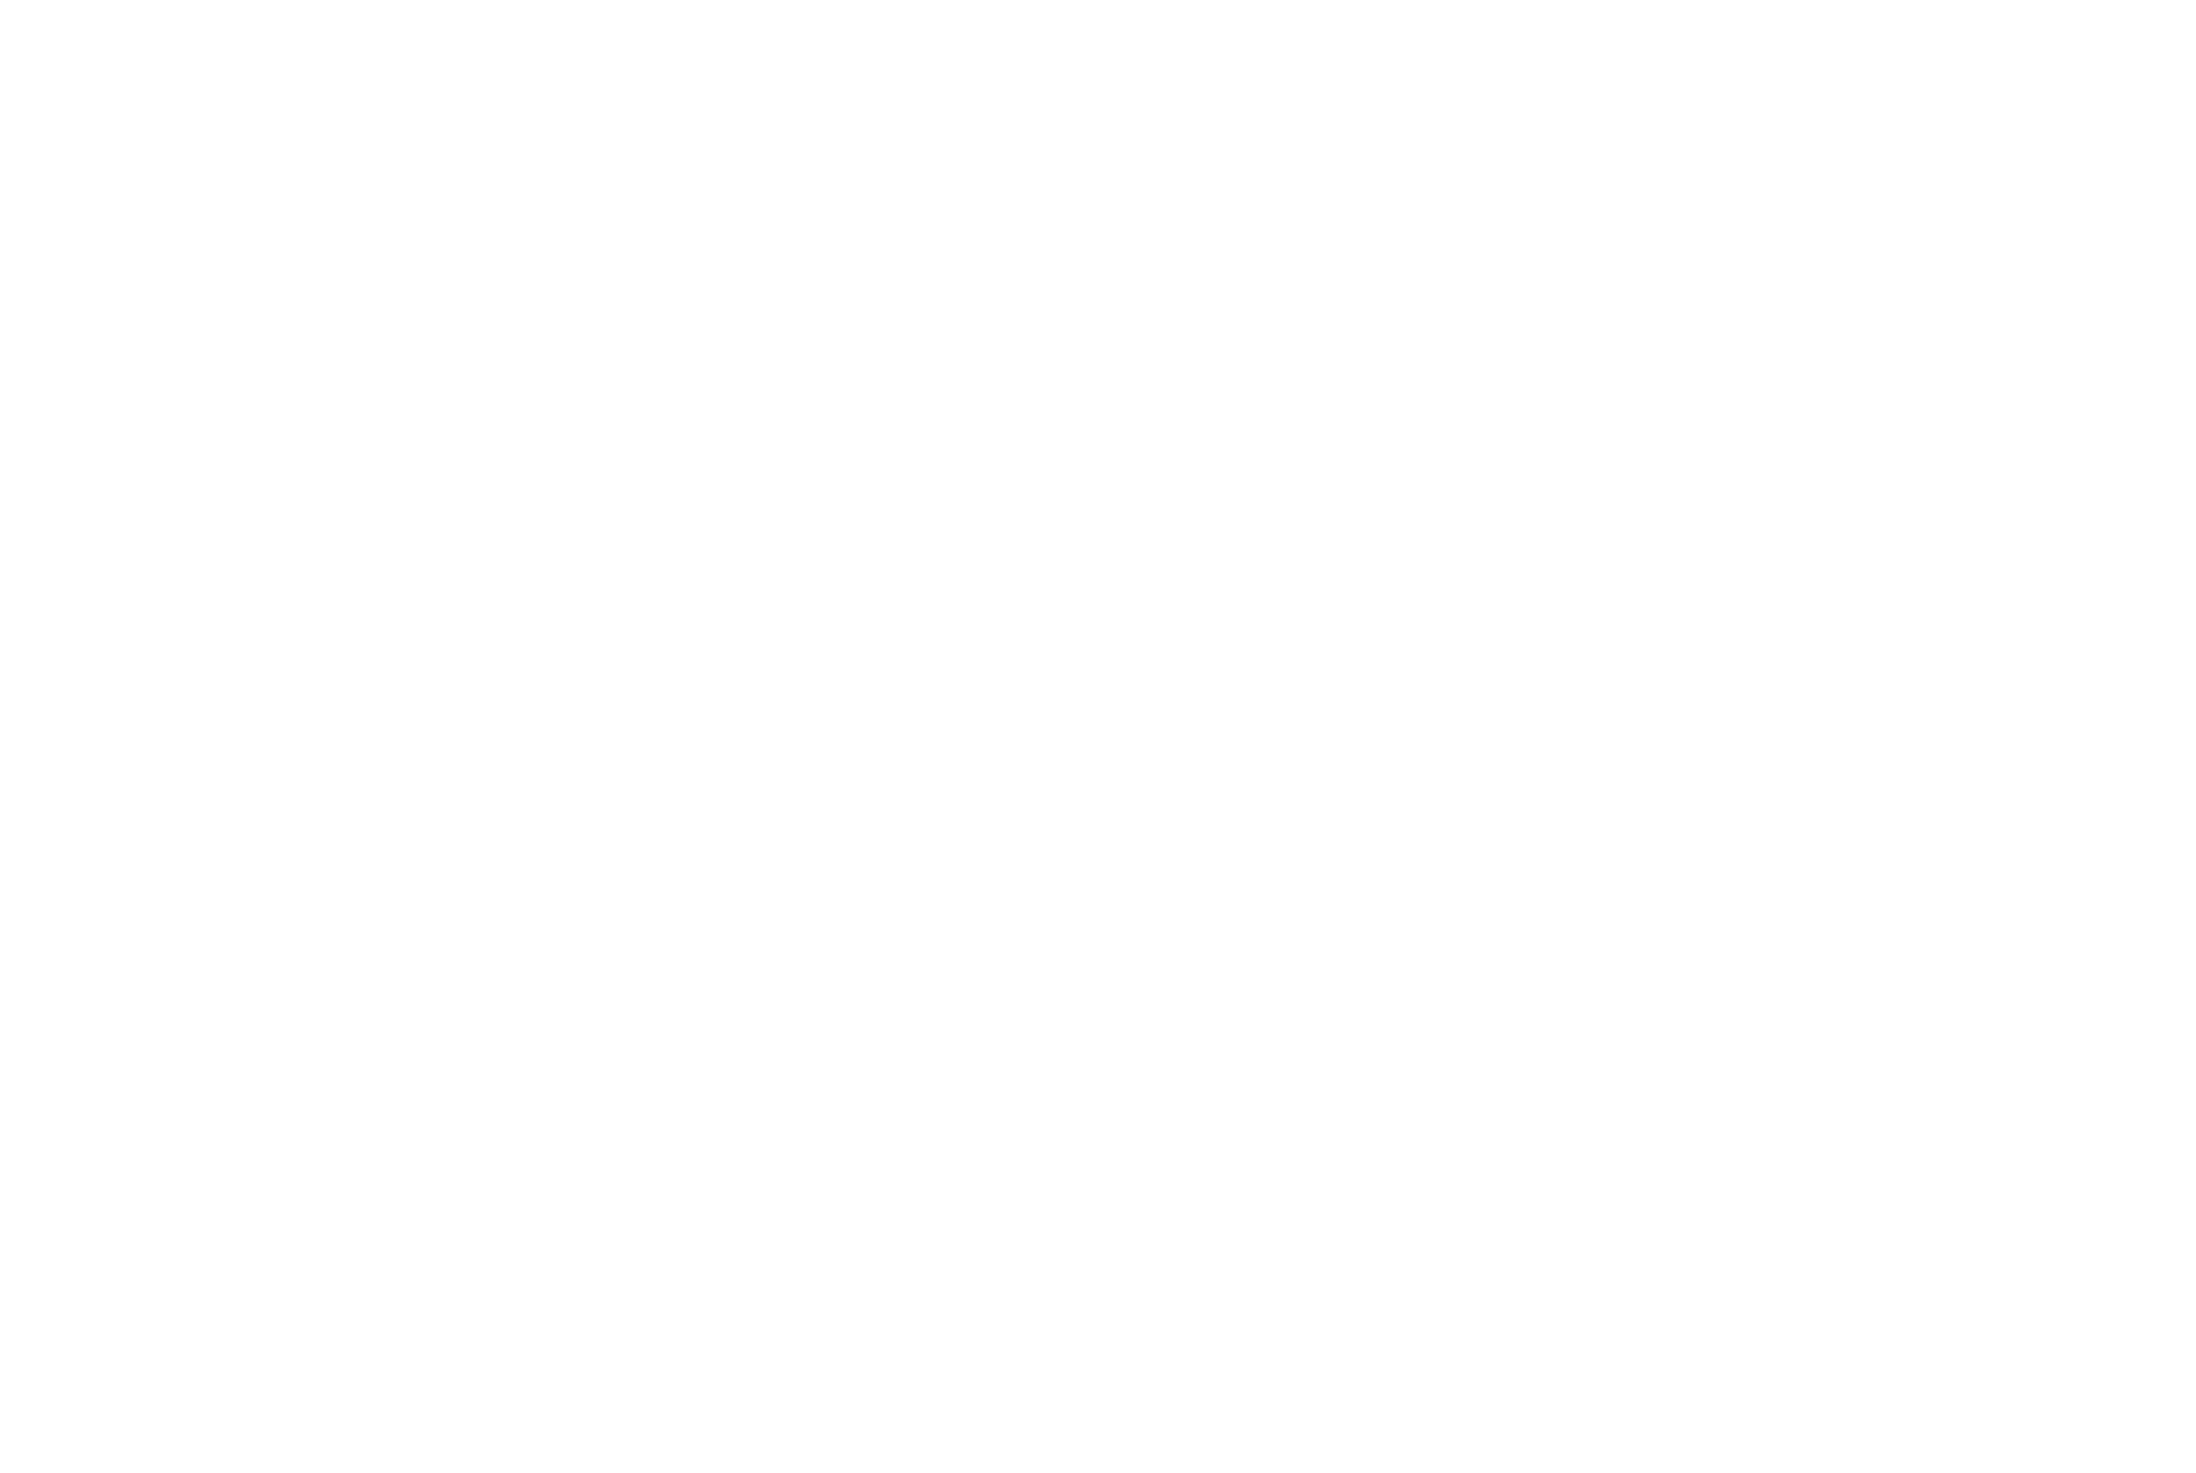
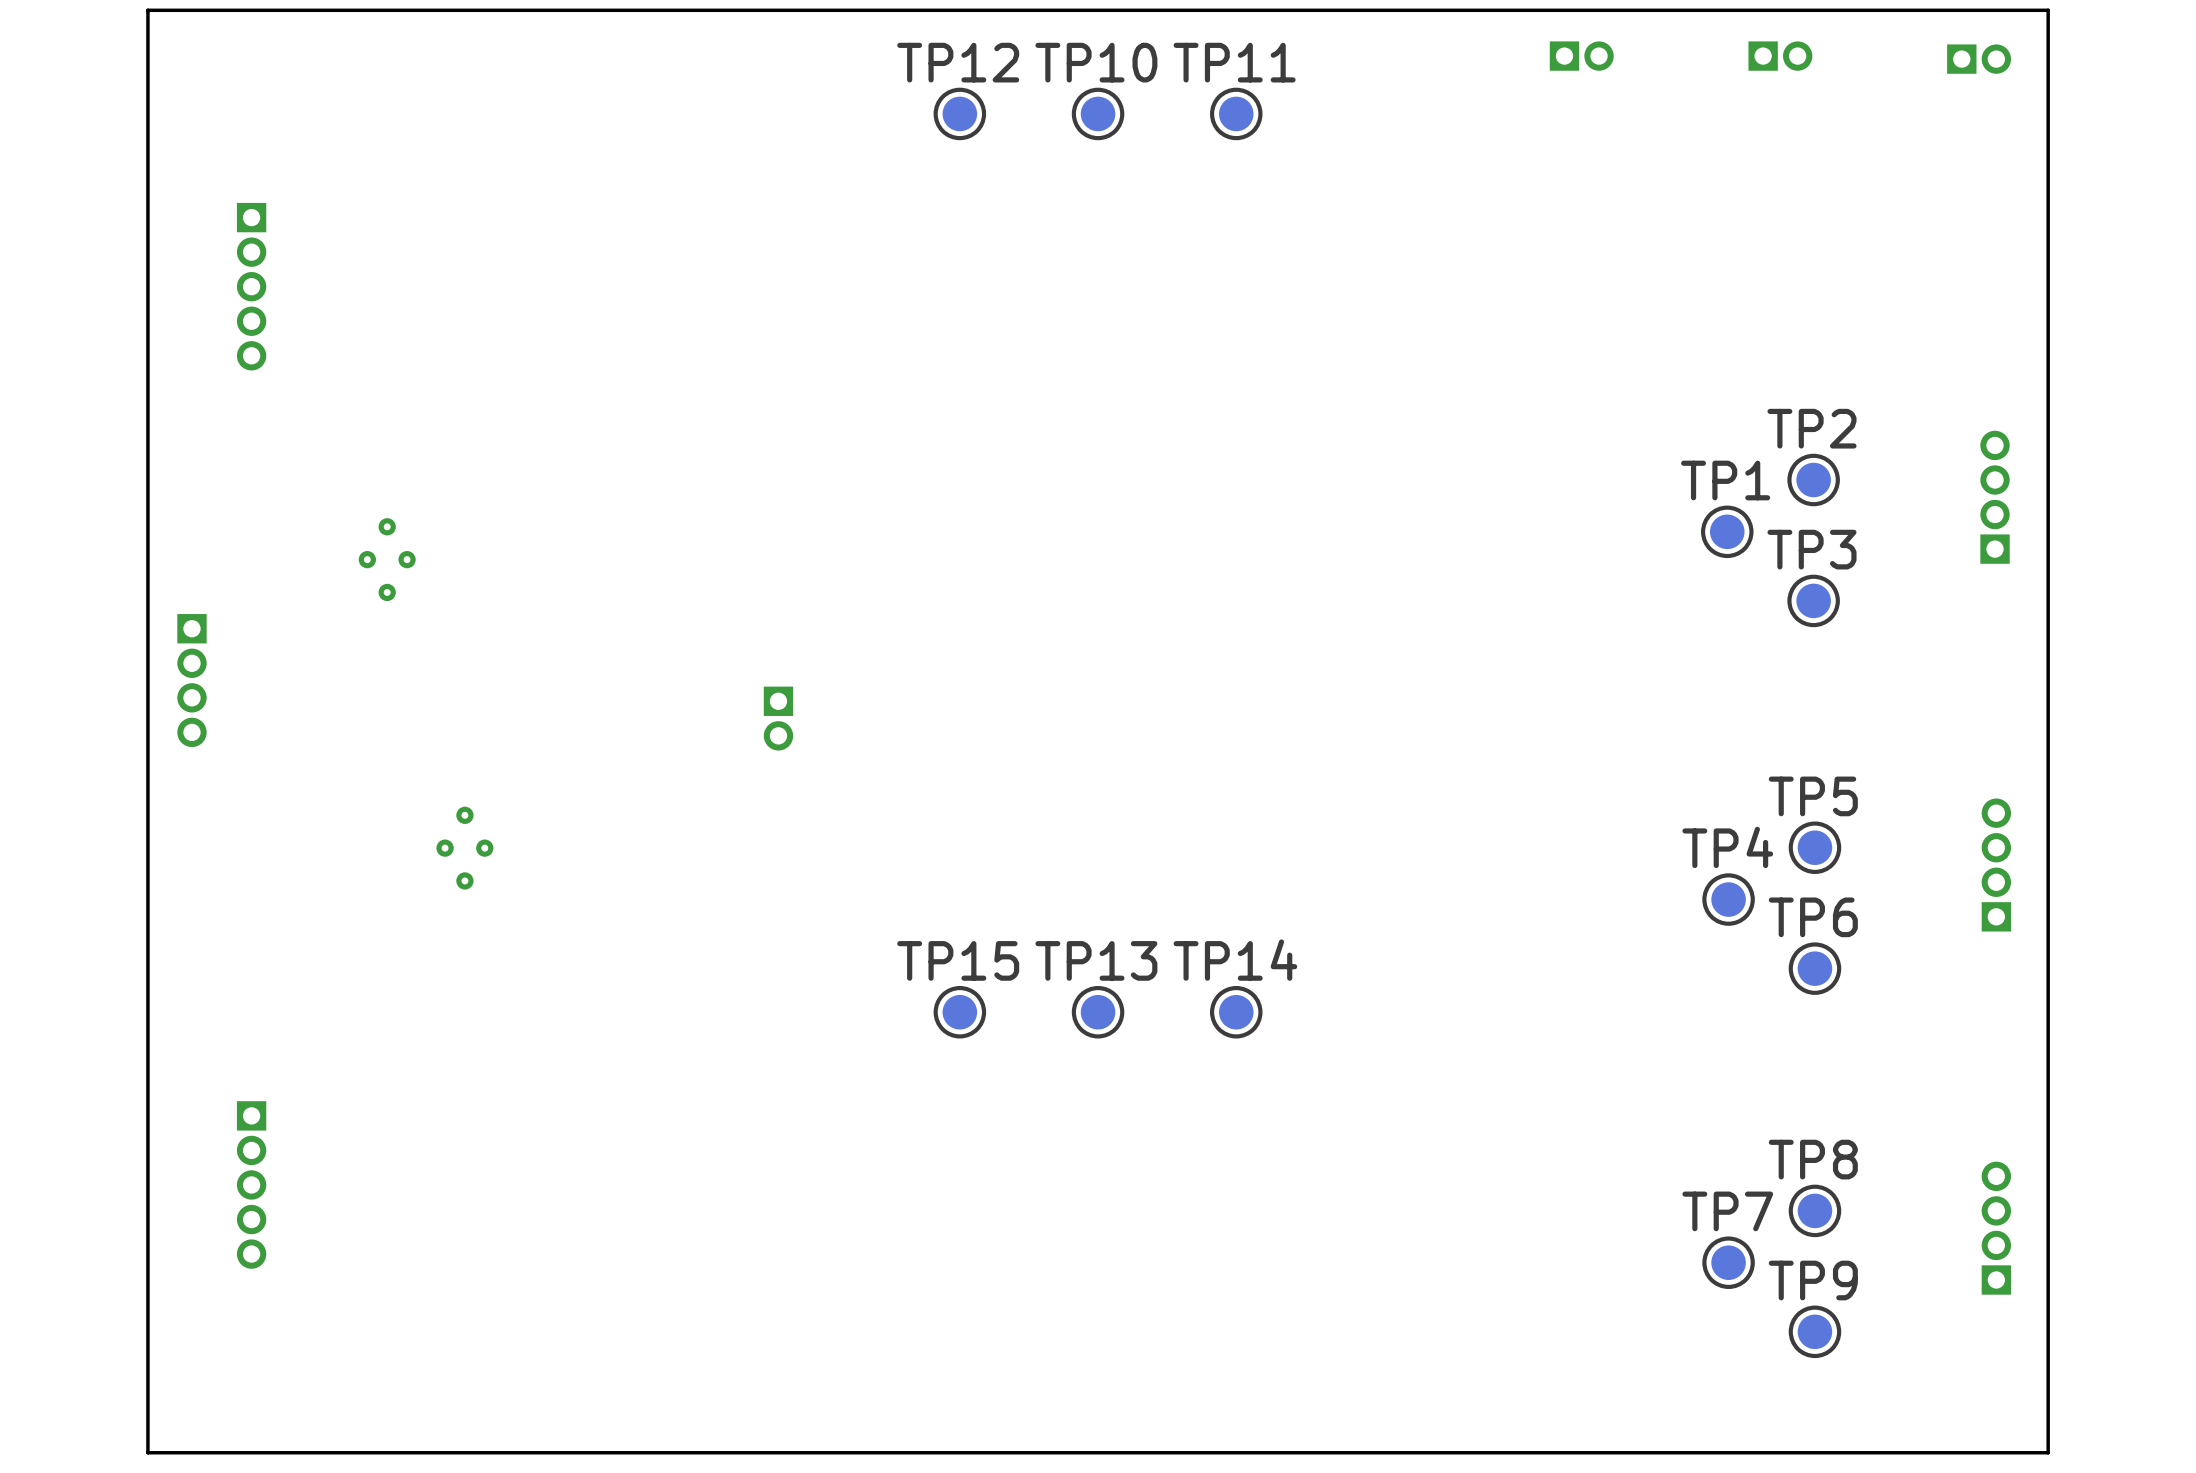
board edge: none -> (2048, 10) (147, 10) (147, 1452) (2048, 1452) (2048, 10)
part: none -> (1581, 56)
part: none -> (1780, 56)
part: none -> (1979, 59)
TP12: none -> (959, 113)
TP10: none -> (1098, 113)
TP11: none -> (1236, 113)
part: none -> (251, 286)
TP2: none -> (1813, 480)
part: none -> (1995, 497)
TP1: none -> (1727, 531)
part: none -> (387, 559)
TP3: none -> (1813, 600)
part: none -> (191, 680)
part: none -> (778, 718)
TP5: none -> (1814, 847)
part: none -> (464, 848)
part: none -> (1996, 865)
TP4: none -> (1728, 899)
TP6: none -> (1814, 968)
TP15: none -> (959, 1012)
TP13: none -> (1098, 1012)
TP14: none -> (1236, 1012)
part: none -> (251, 1184)
TP8: none -> (1814, 1210)
part: none -> (1996, 1228)
TP7: none -> (1728, 1262)
TP9: none -> (1814, 1331)

